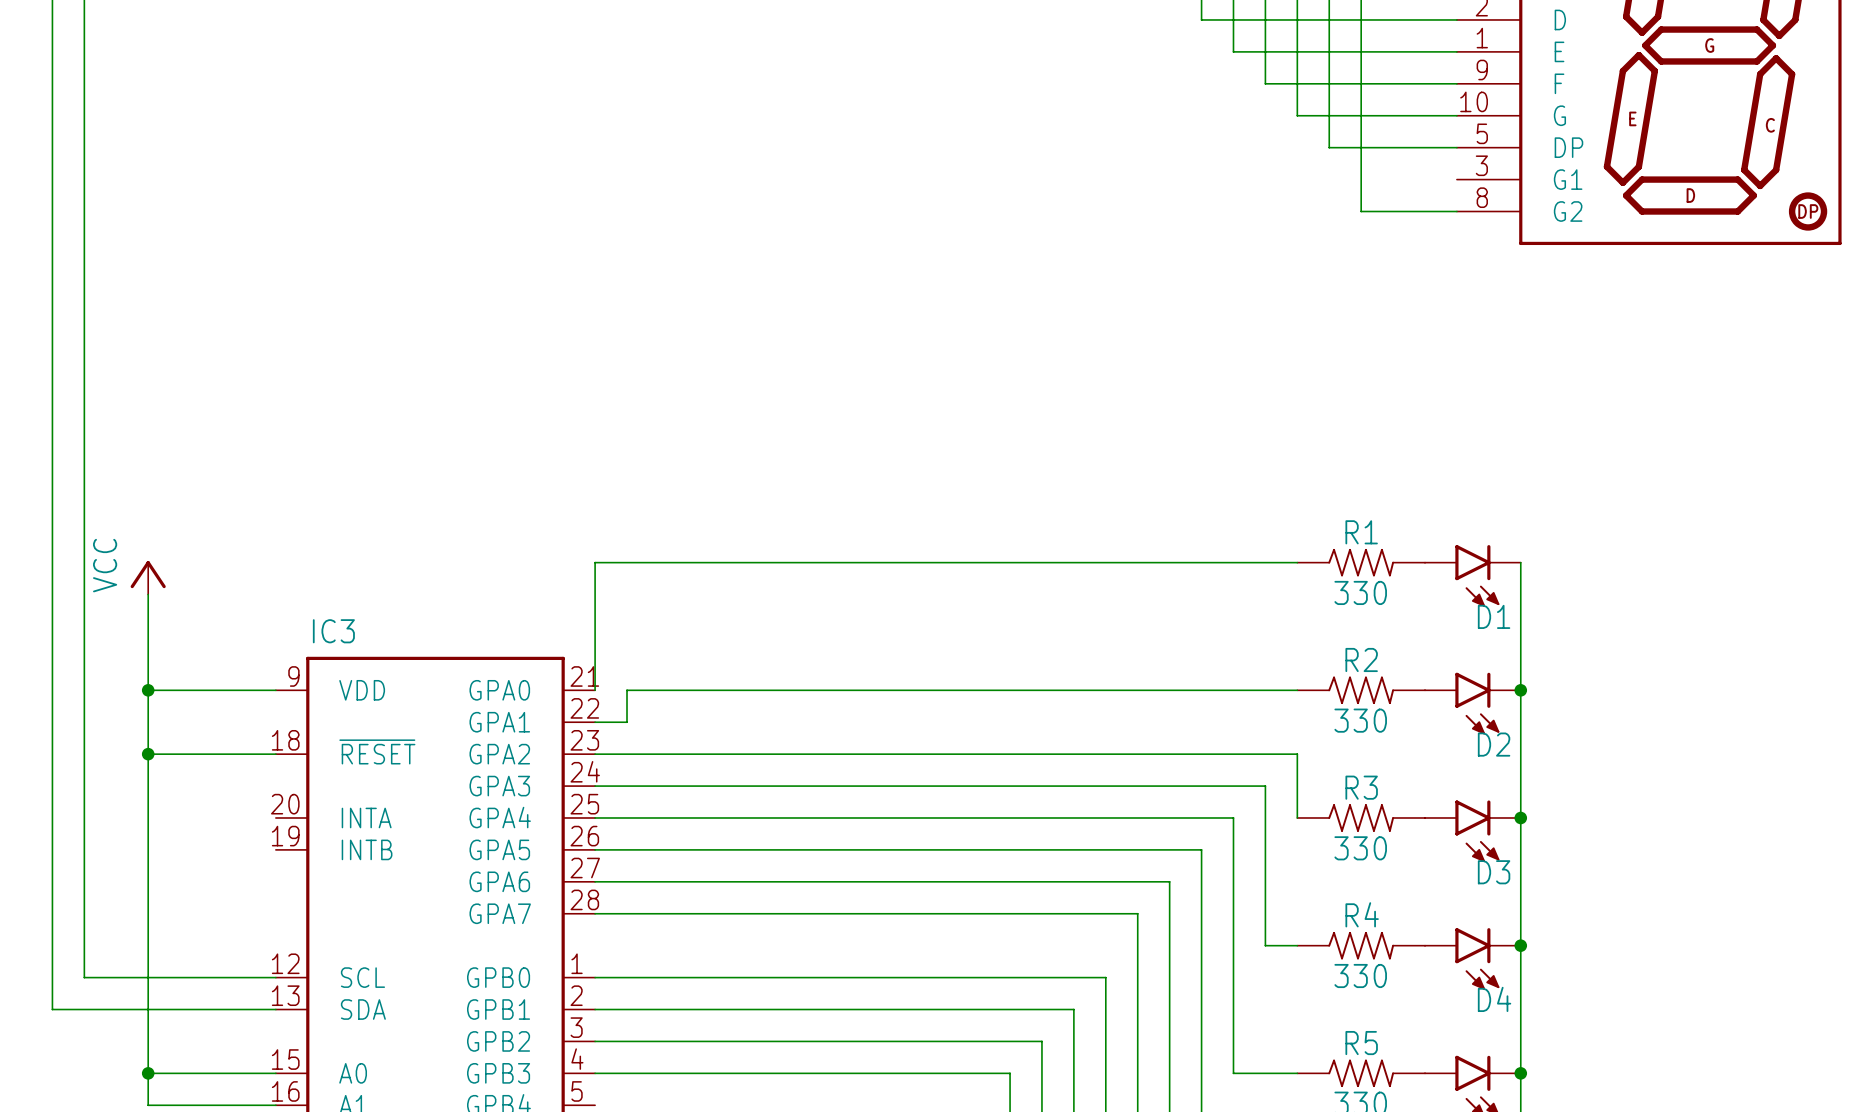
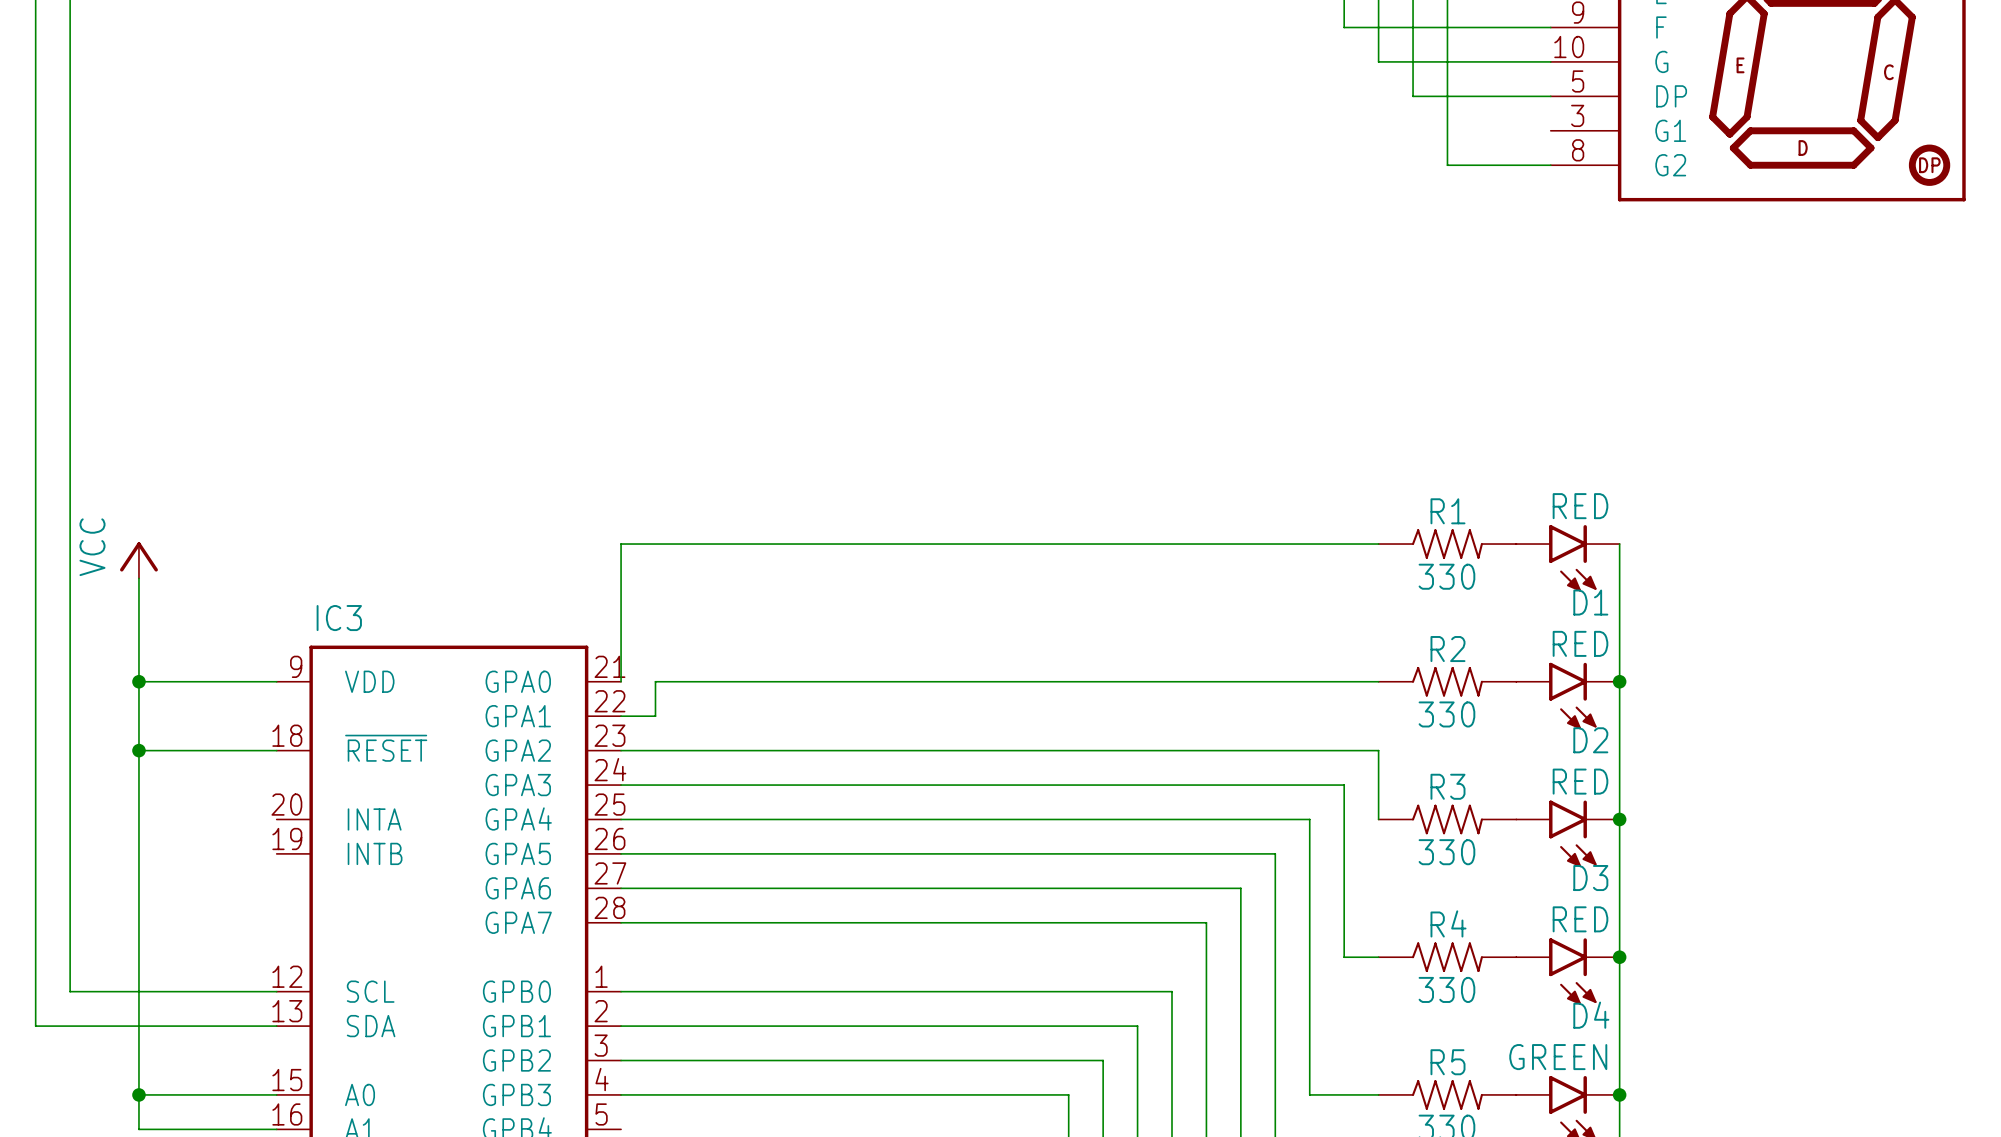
D1 value: none -> RED (1580, 506)
D2 value: none -> RED (1580, 643)
D3 value: none -> RED (1580, 781)
D4 value: none -> RED (1580, 919)
part value: none -> GREEN (1558, 1057)

